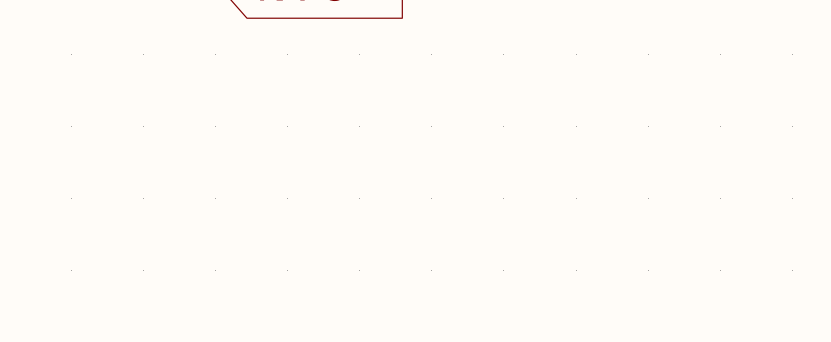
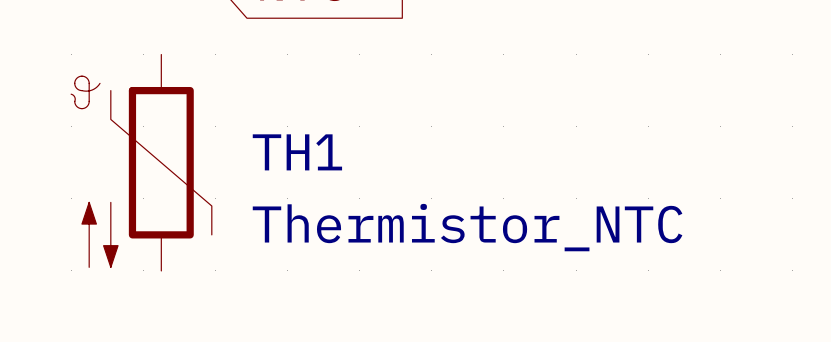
TH1: none -> Thermistor_NTC (141, 162)

